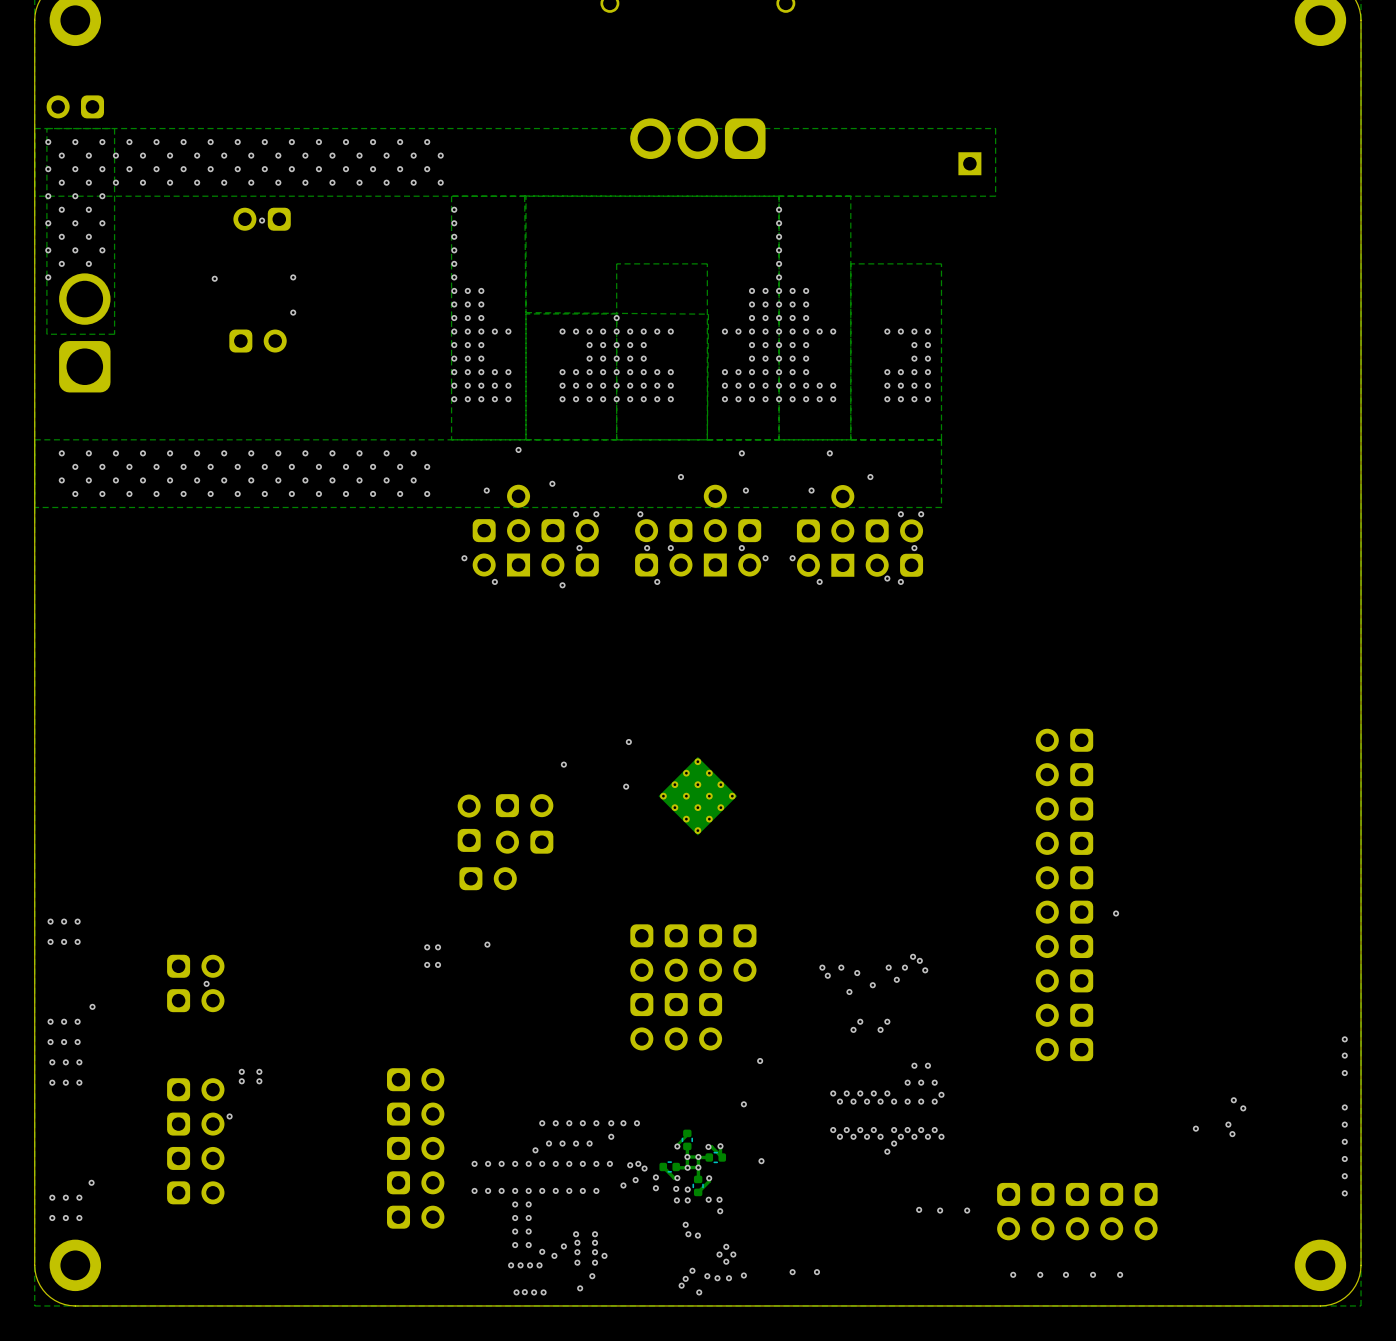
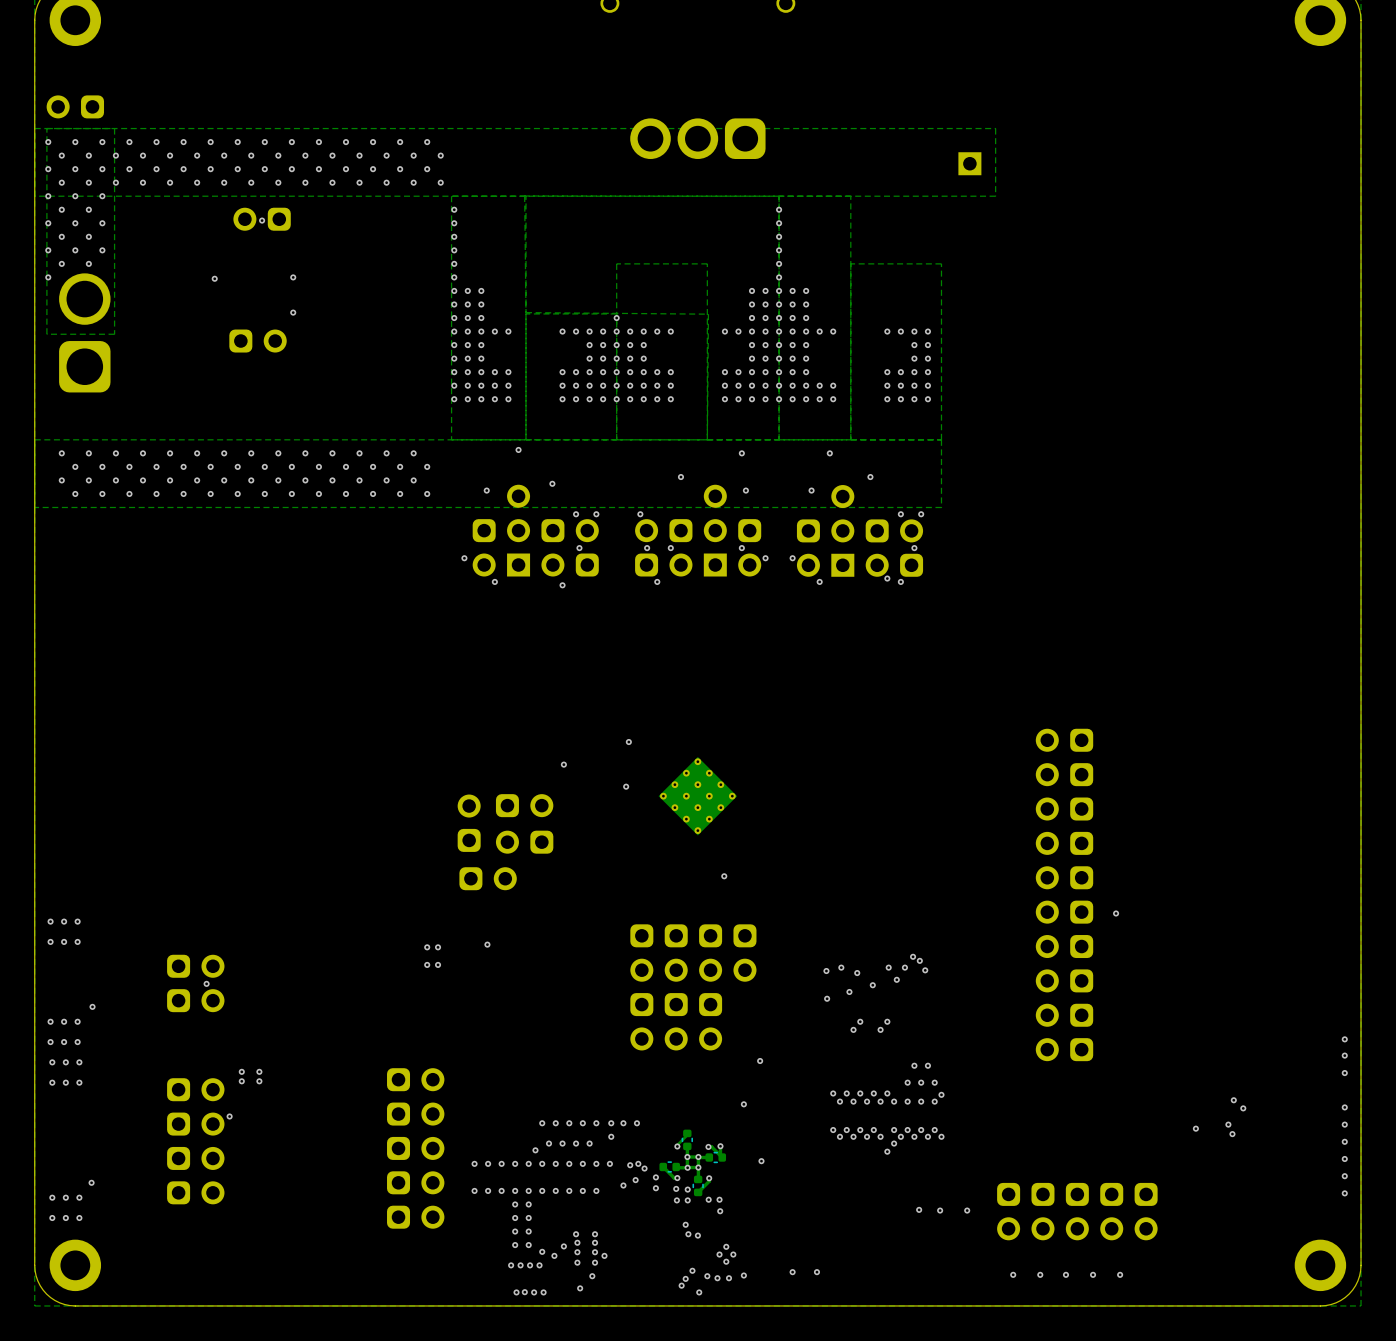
via: none -> (724, 876)
via: (822, 967) -> none
via: none -> (826, 971)
via: (827, 975) -> none
via: none -> (827, 998)

